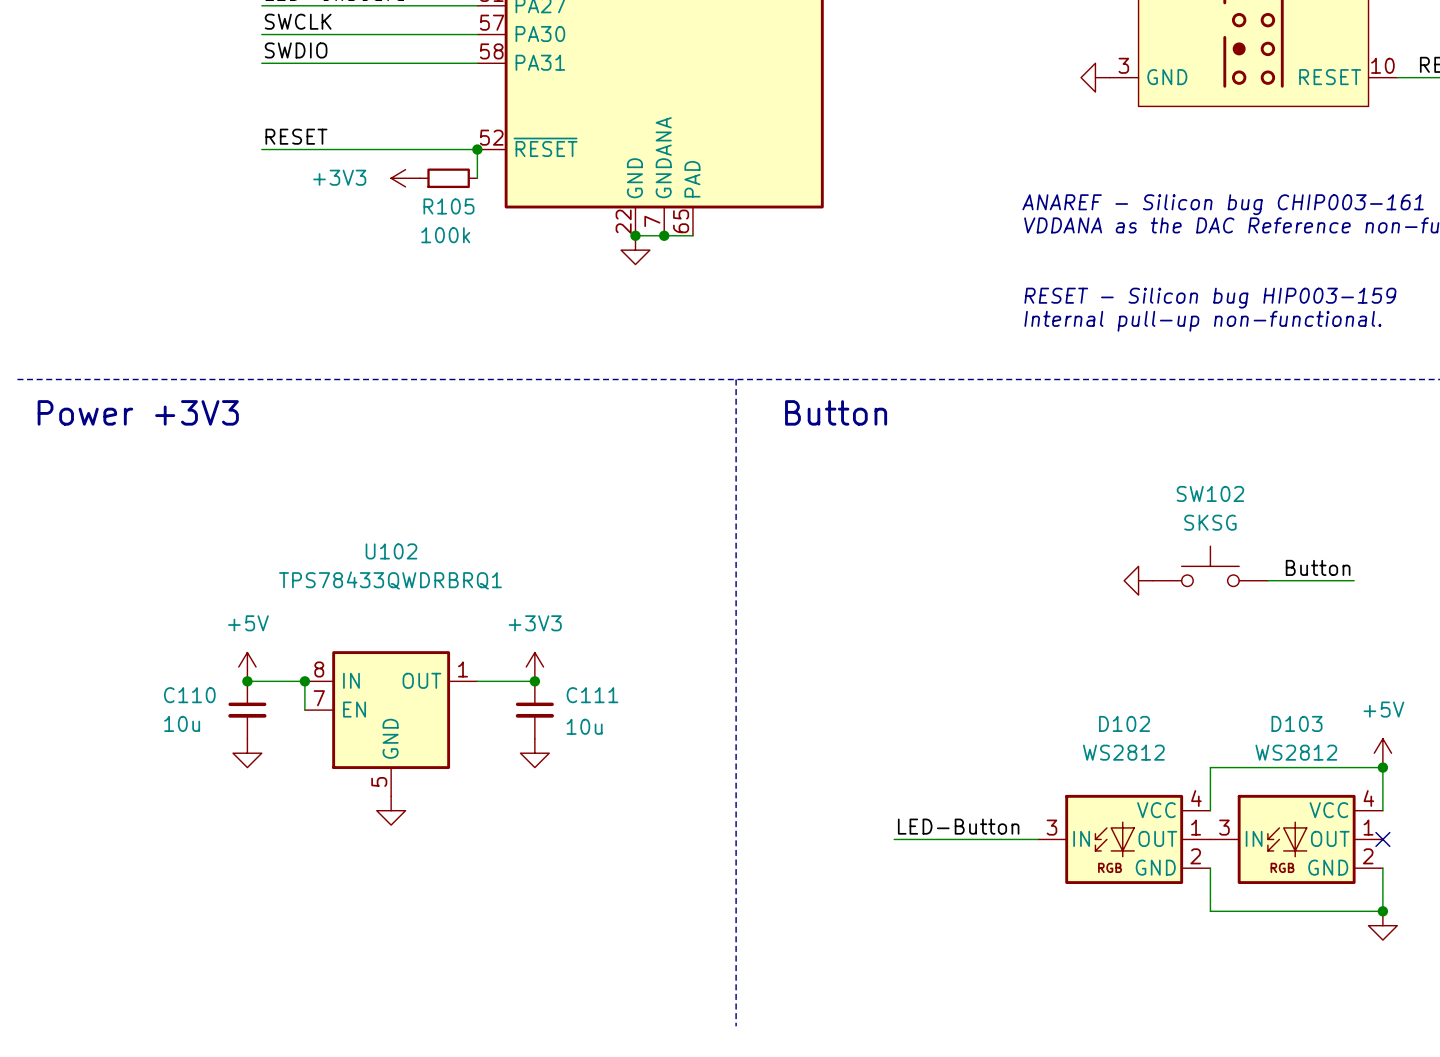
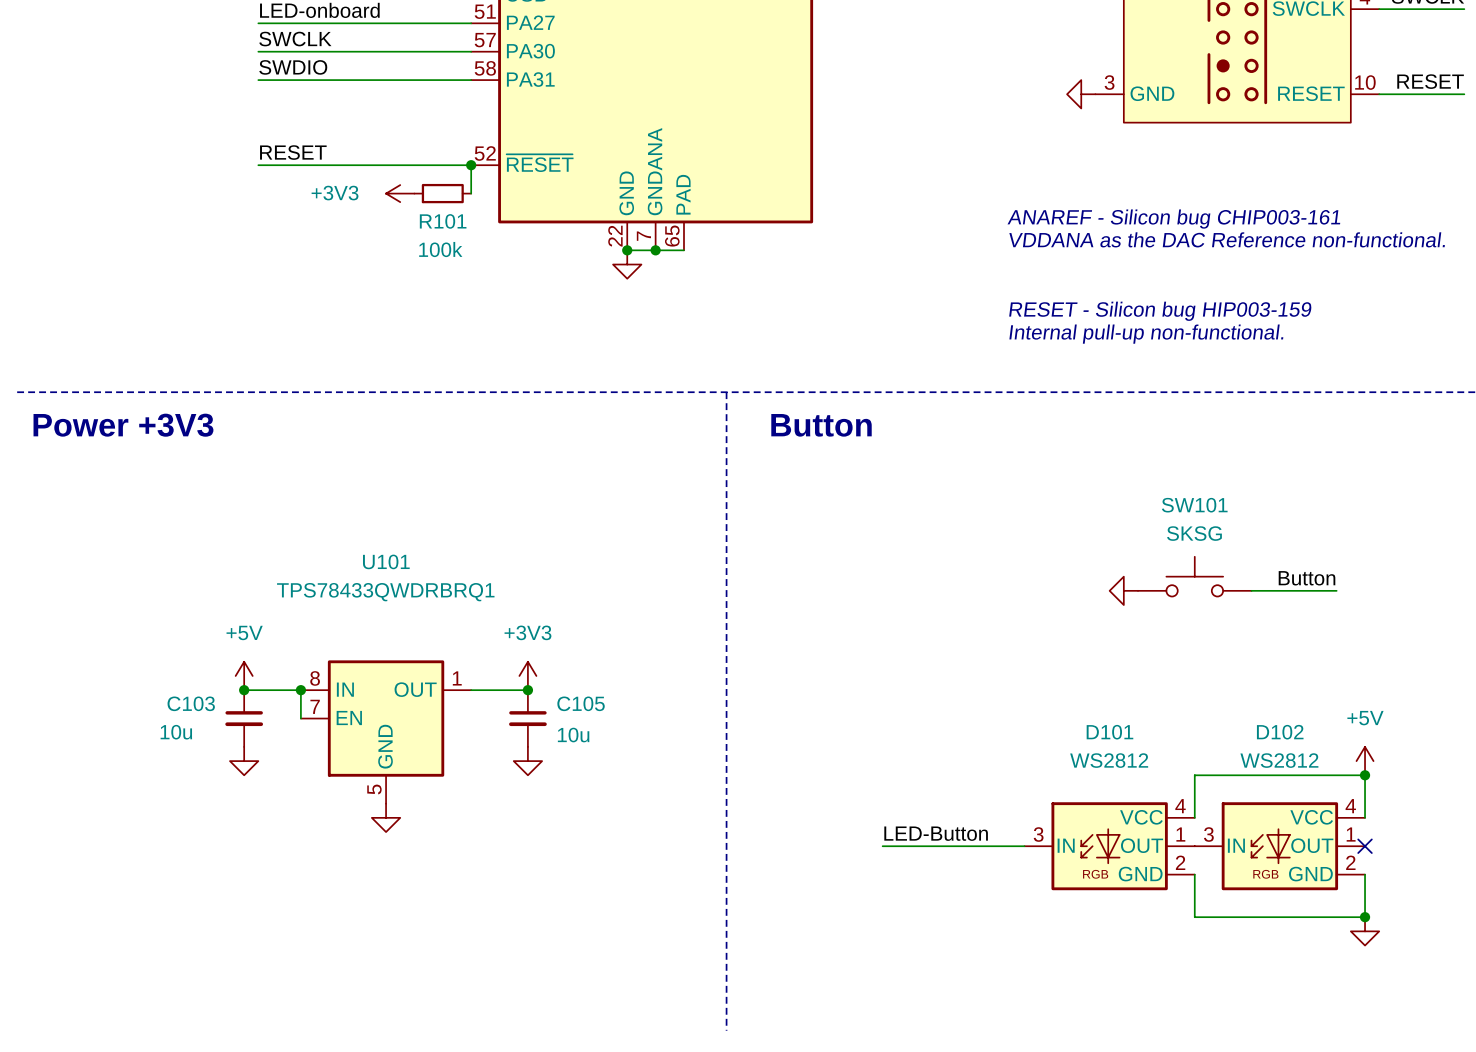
R105 name: R105 (448, 206) -> R101 (443, 221)
SW102 name: SW102 (1210, 493) -> SW101 (1194, 505)
U102 name: U102 (391, 551) -> U101 (386, 561)
C110 name: C110 (189, 695) -> C103 (191, 703)
C111 name: C111 (592, 695) -> C105 (581, 703)
D102 name: D102 (1124, 723) -> D101 (1109, 732)
D103 name: D103 (1297, 723) -> D102 (1280, 732)

